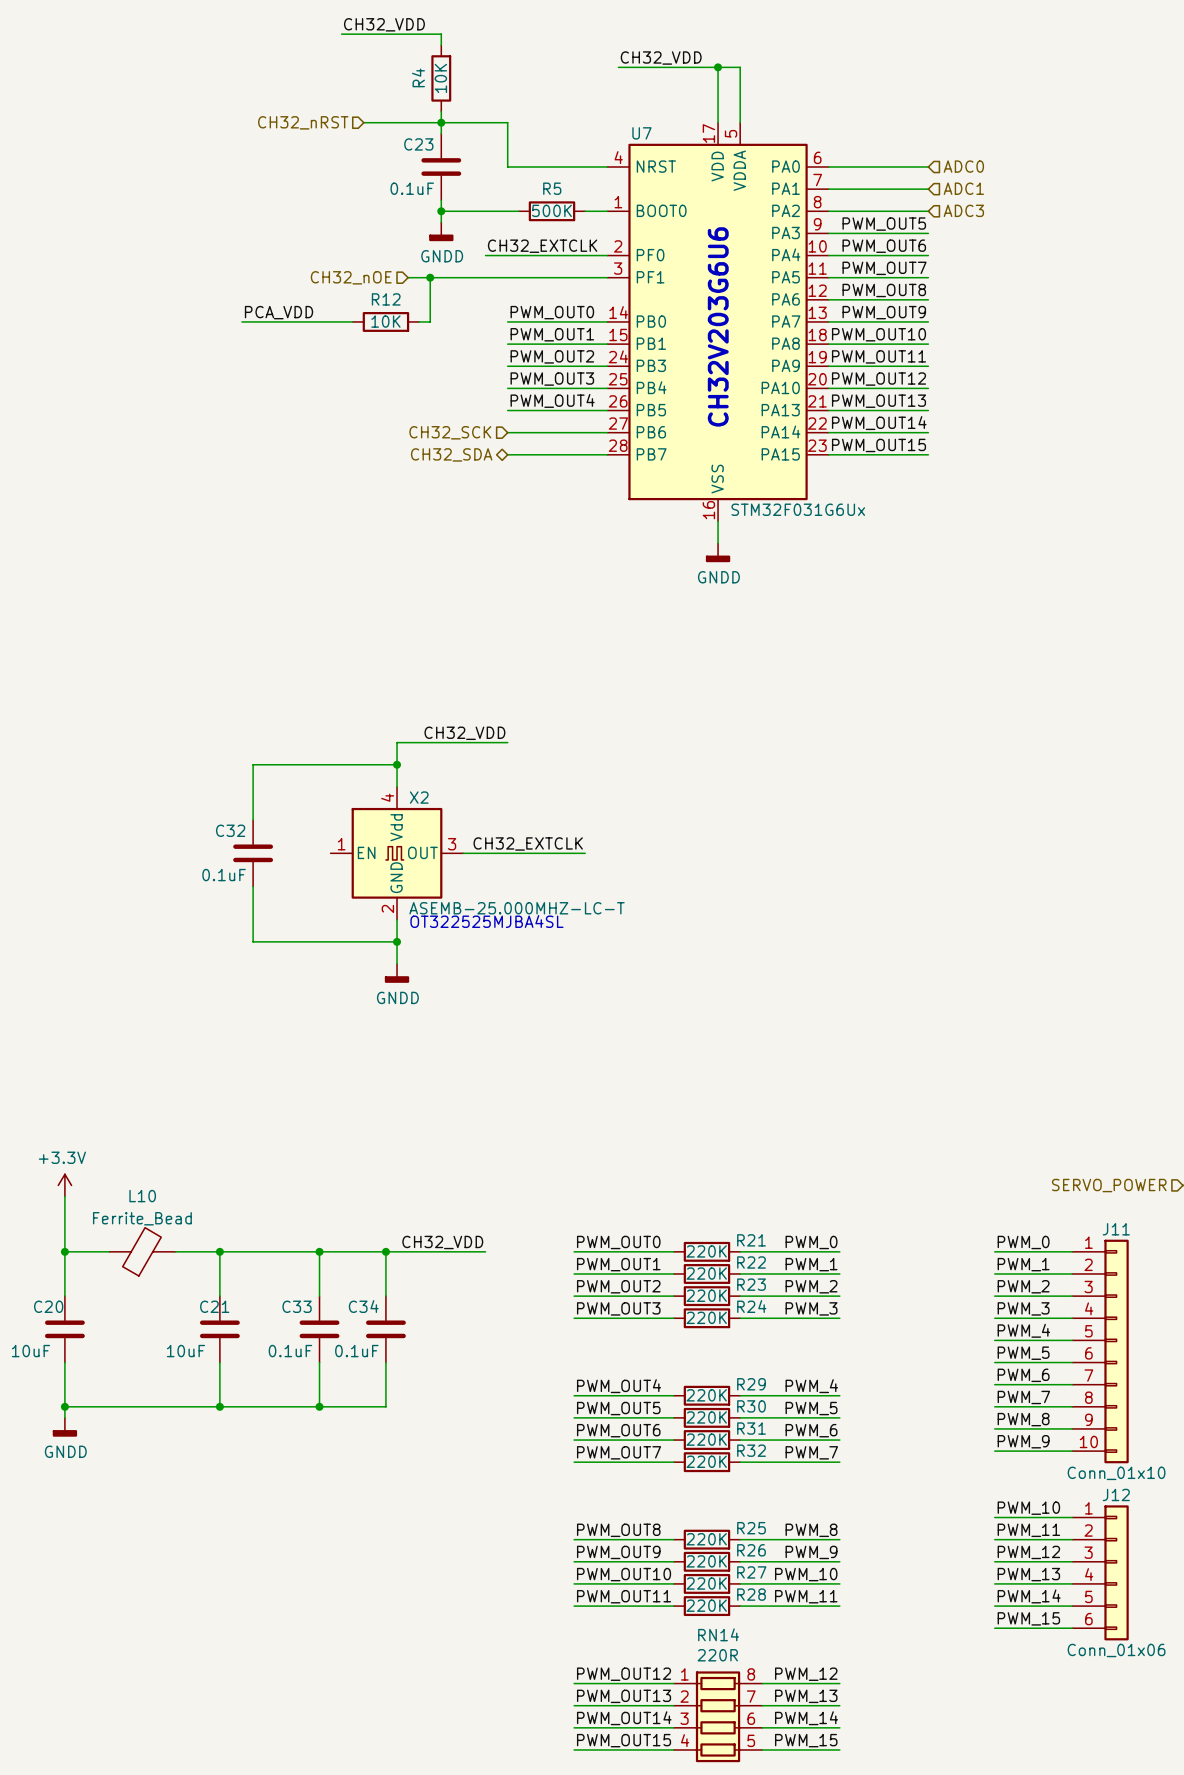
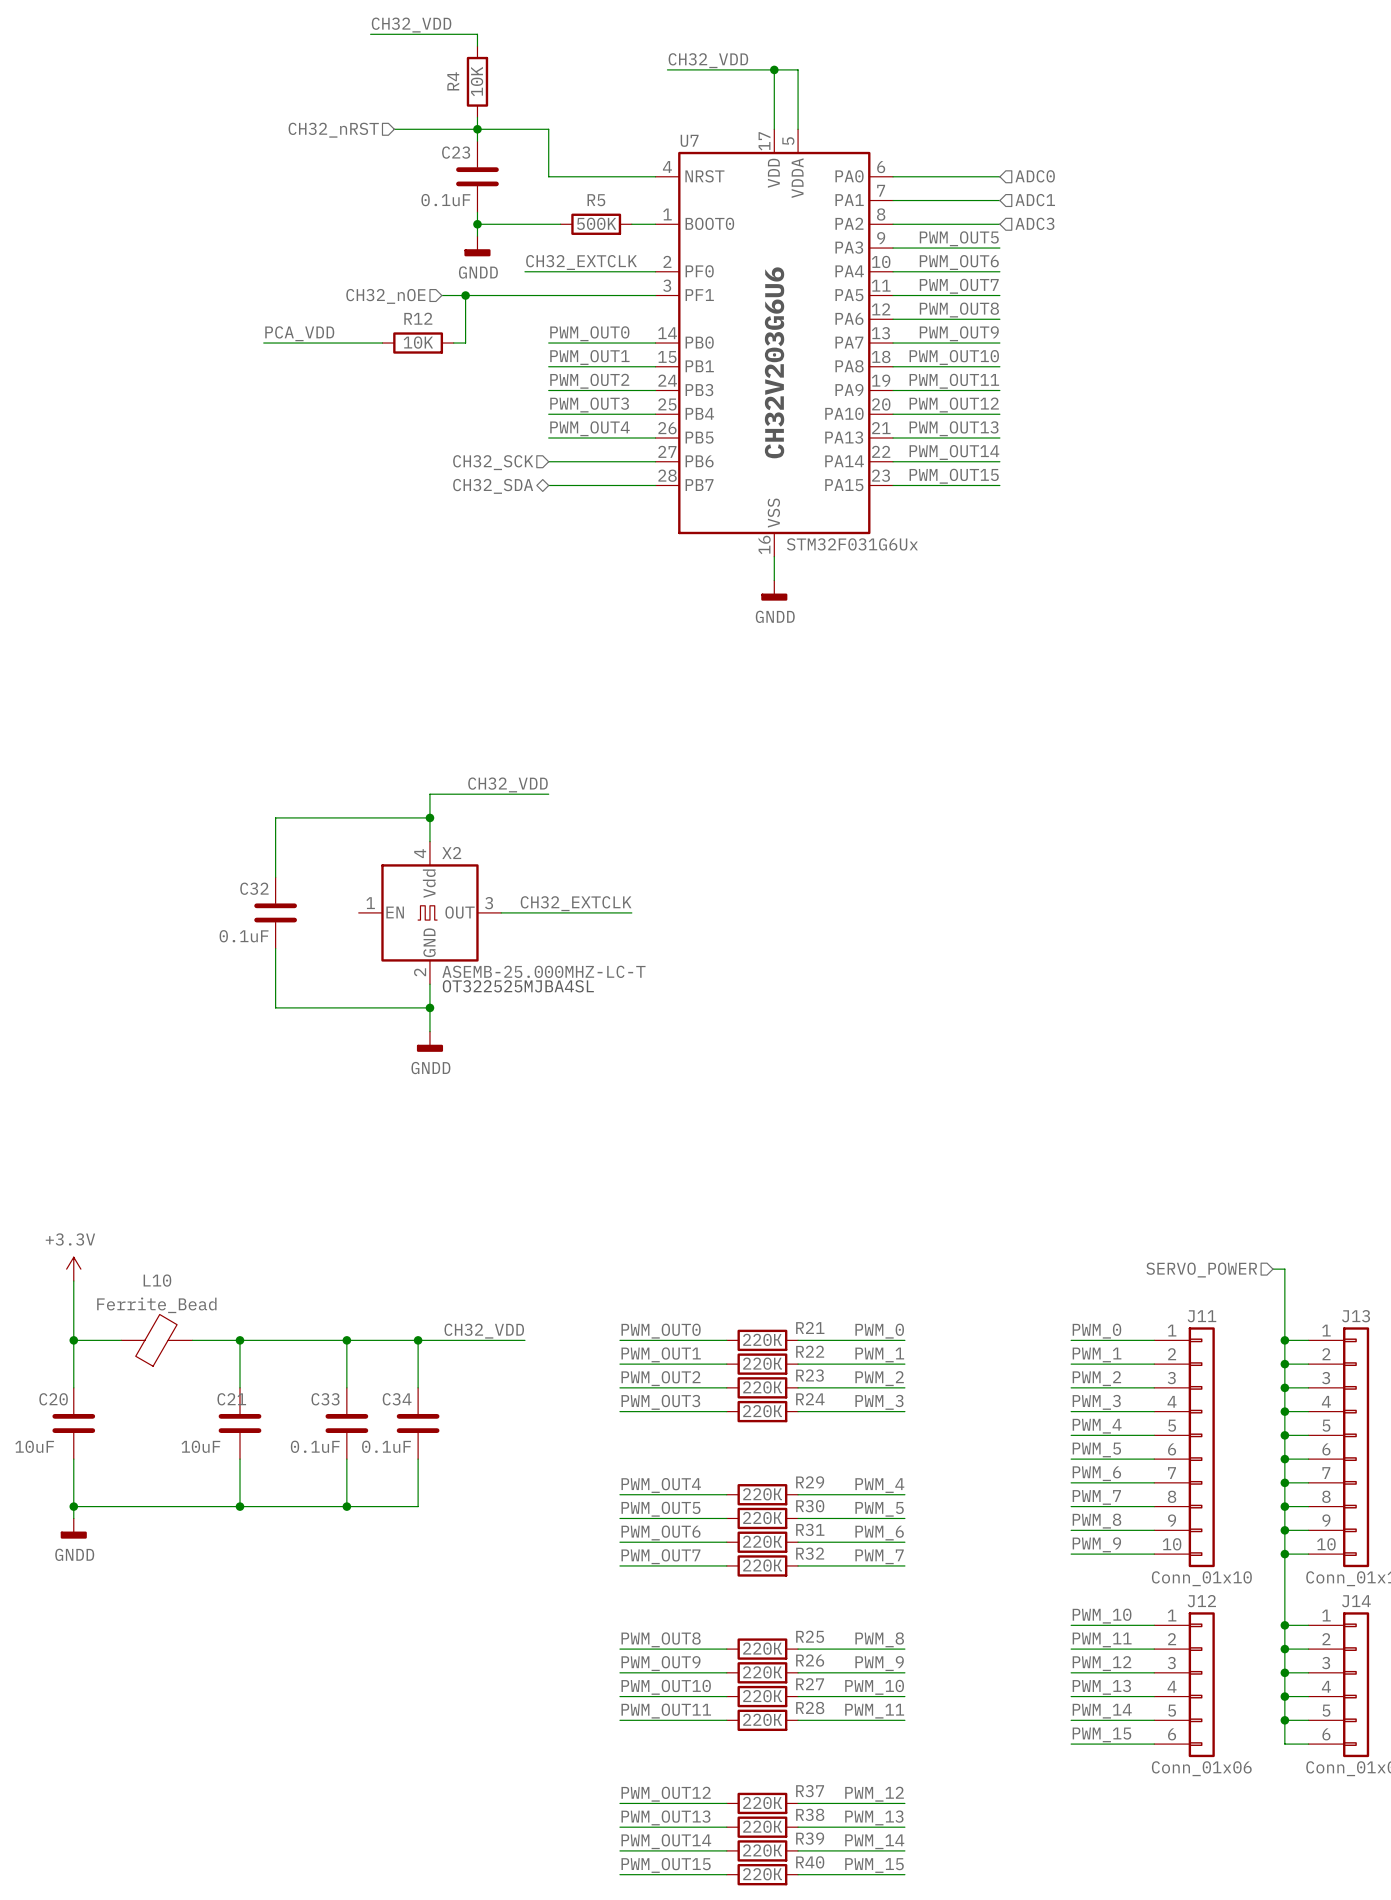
R37: none -> 220К (762, 1803)
R38: none -> 220К (762, 1827)
RN14: 220R (718, 1716) -> none
R39: none -> 220К (762, 1850)
R40: none -> 220К (762, 1874)

